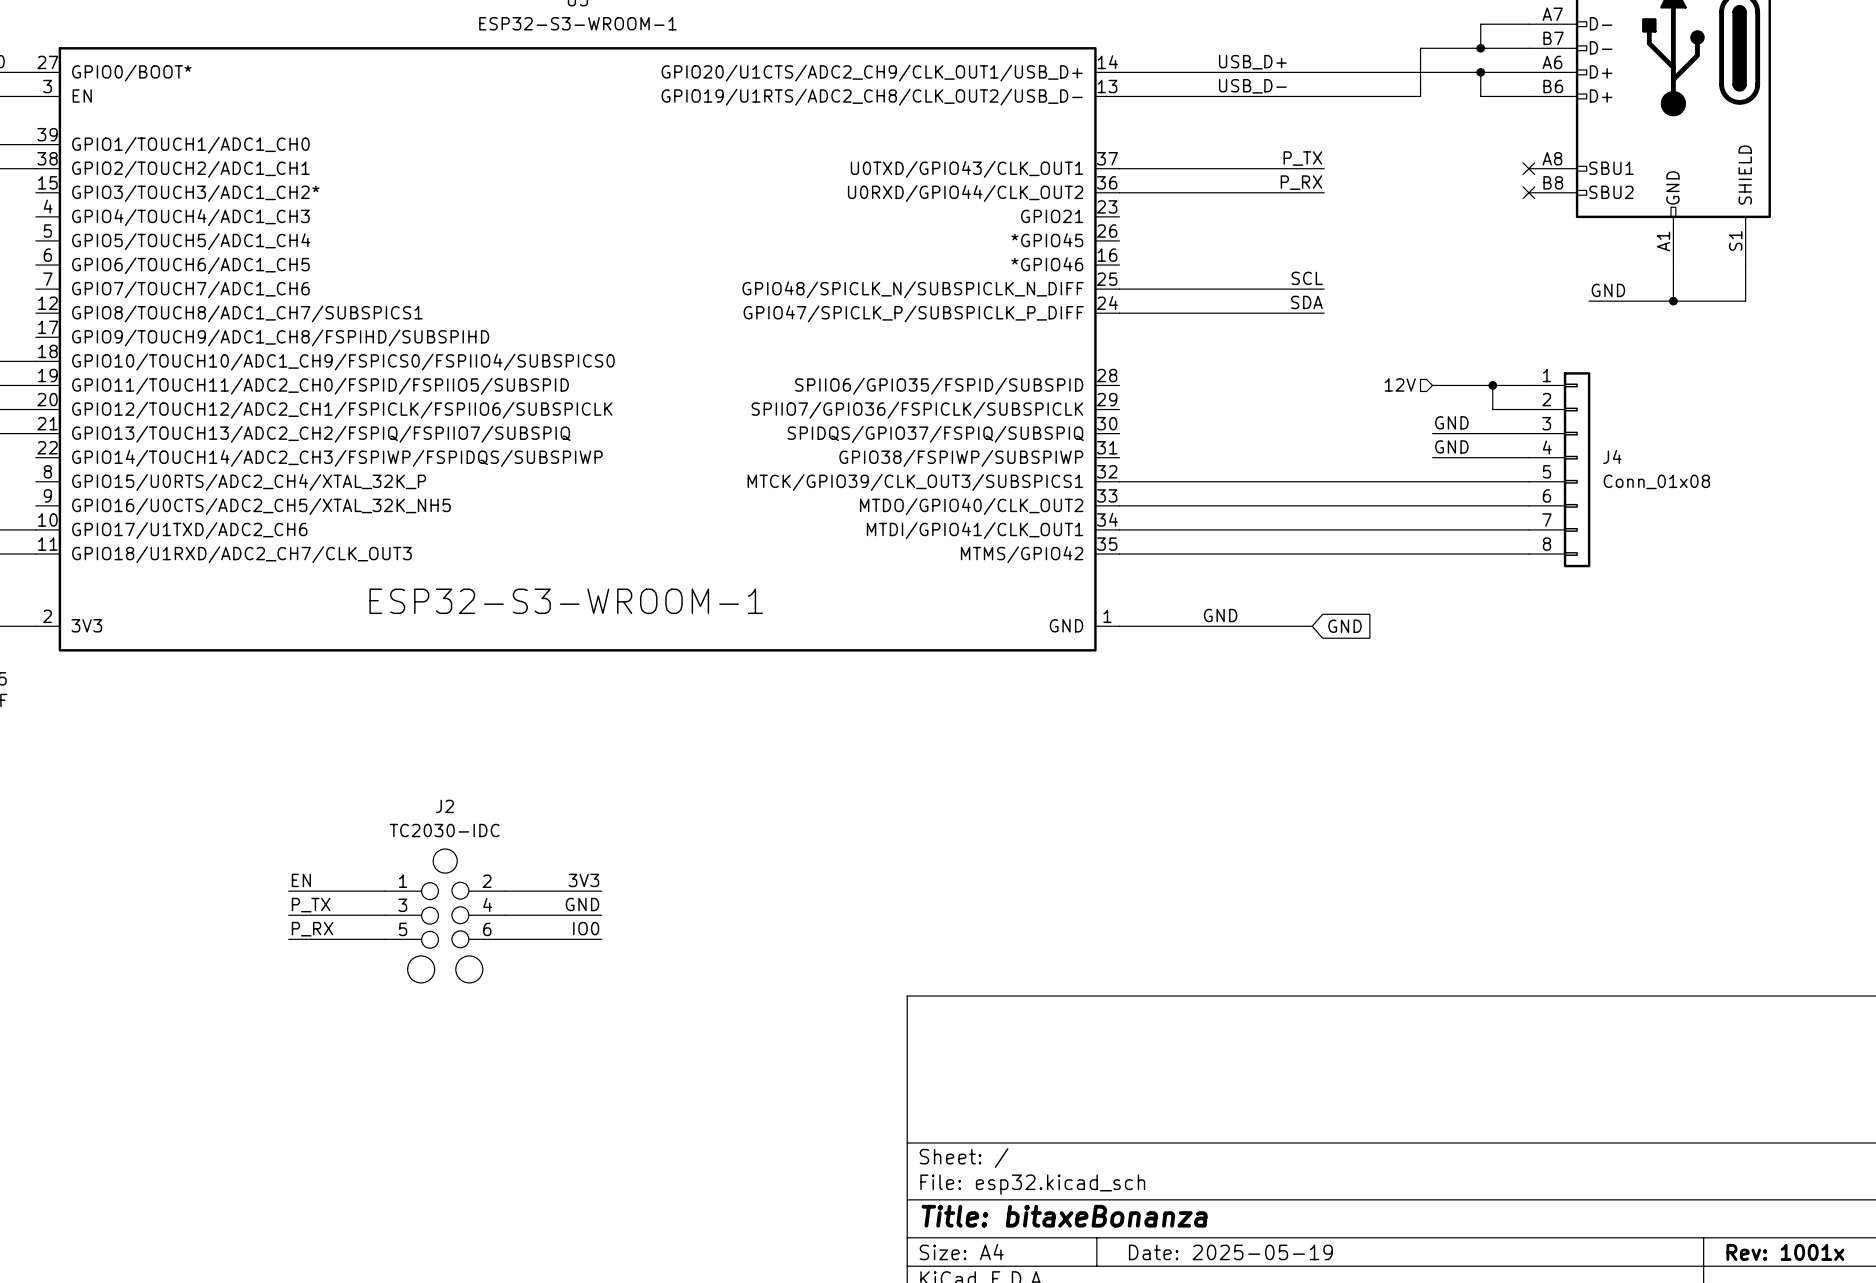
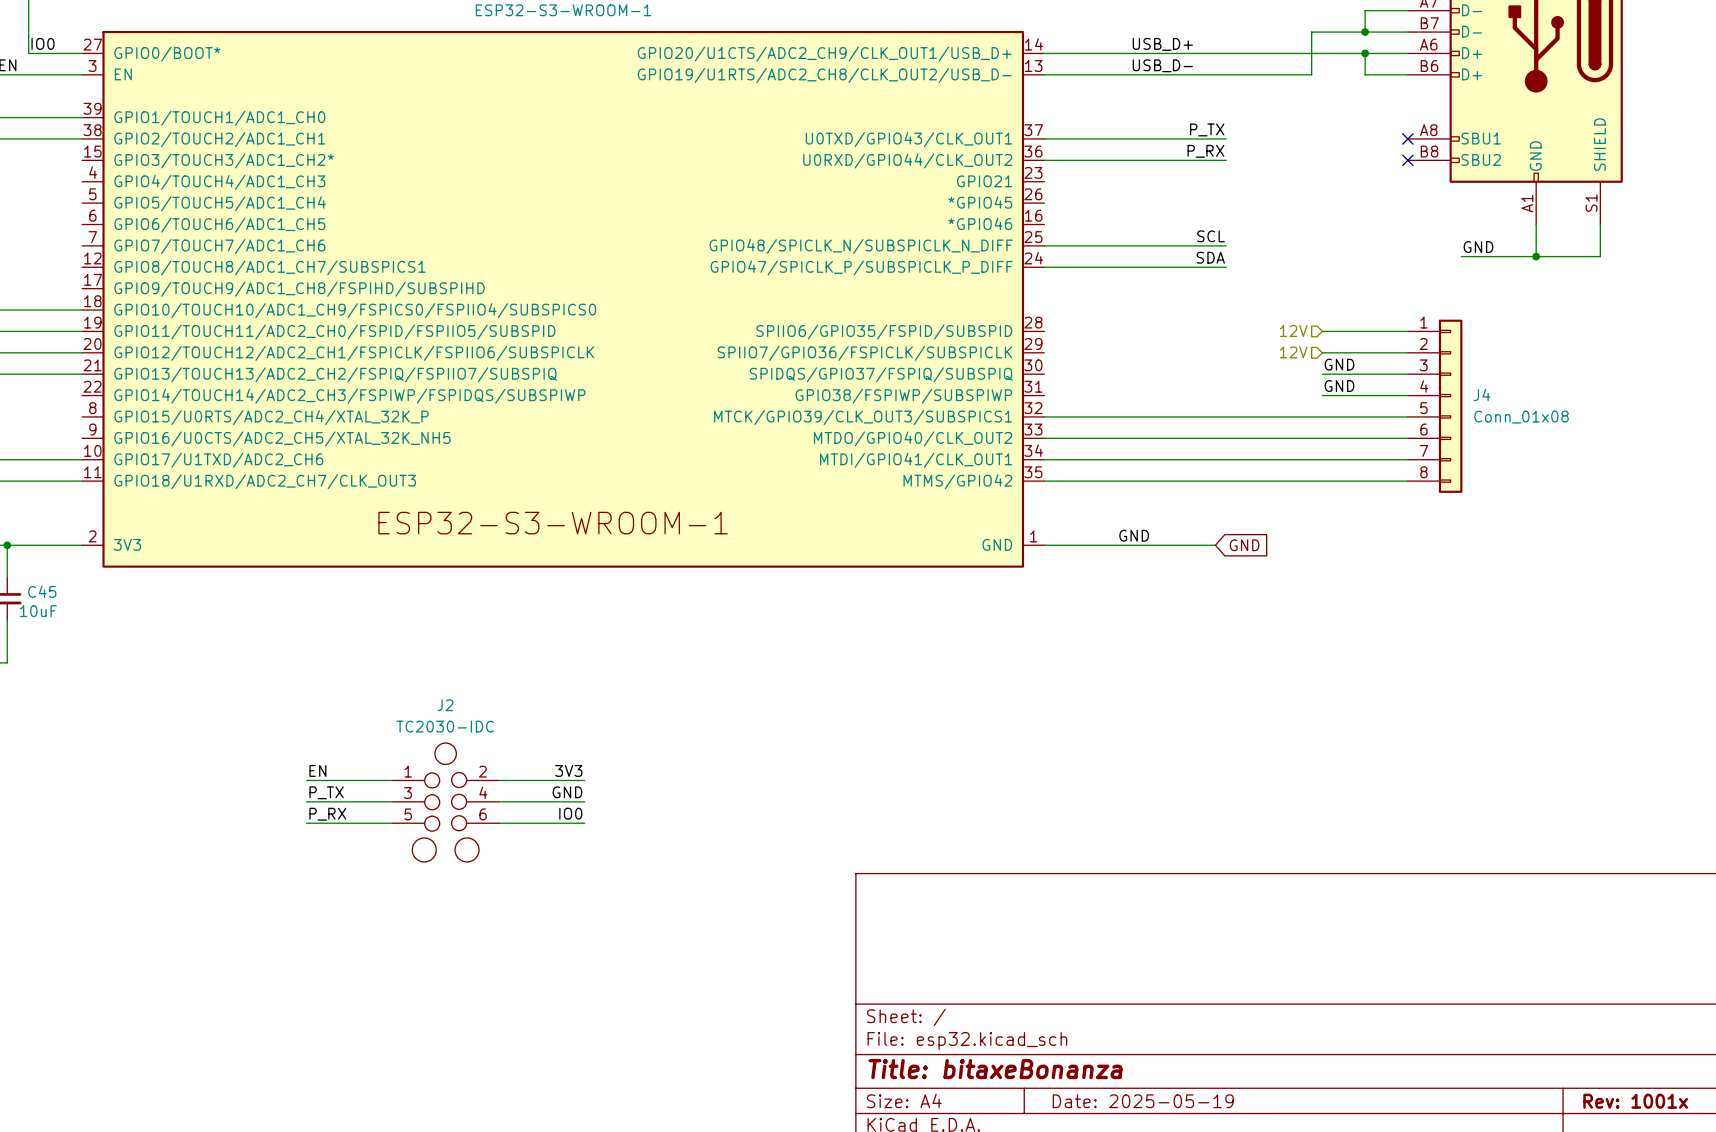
wire: (1492, 385) (1492, 409) -> (1322, 352) (1375, 352)
junction: (1492, 385) -> none
hierarchical label: none -> 12V (1293, 352)

